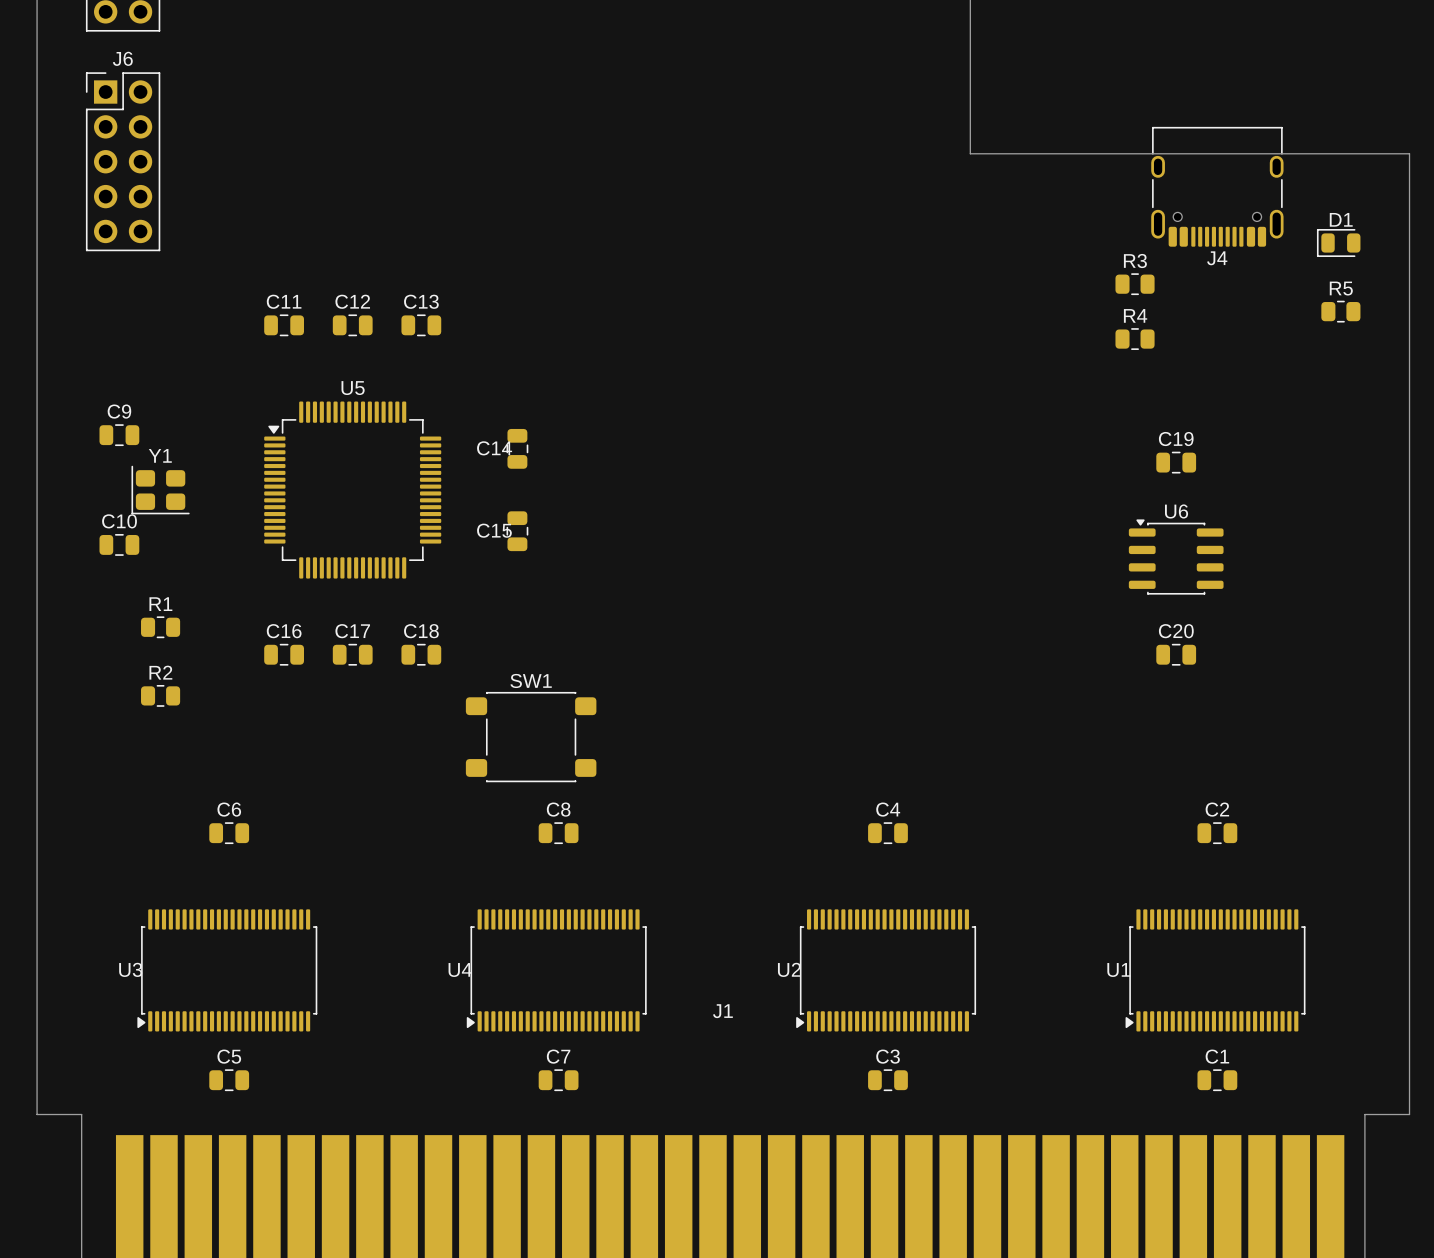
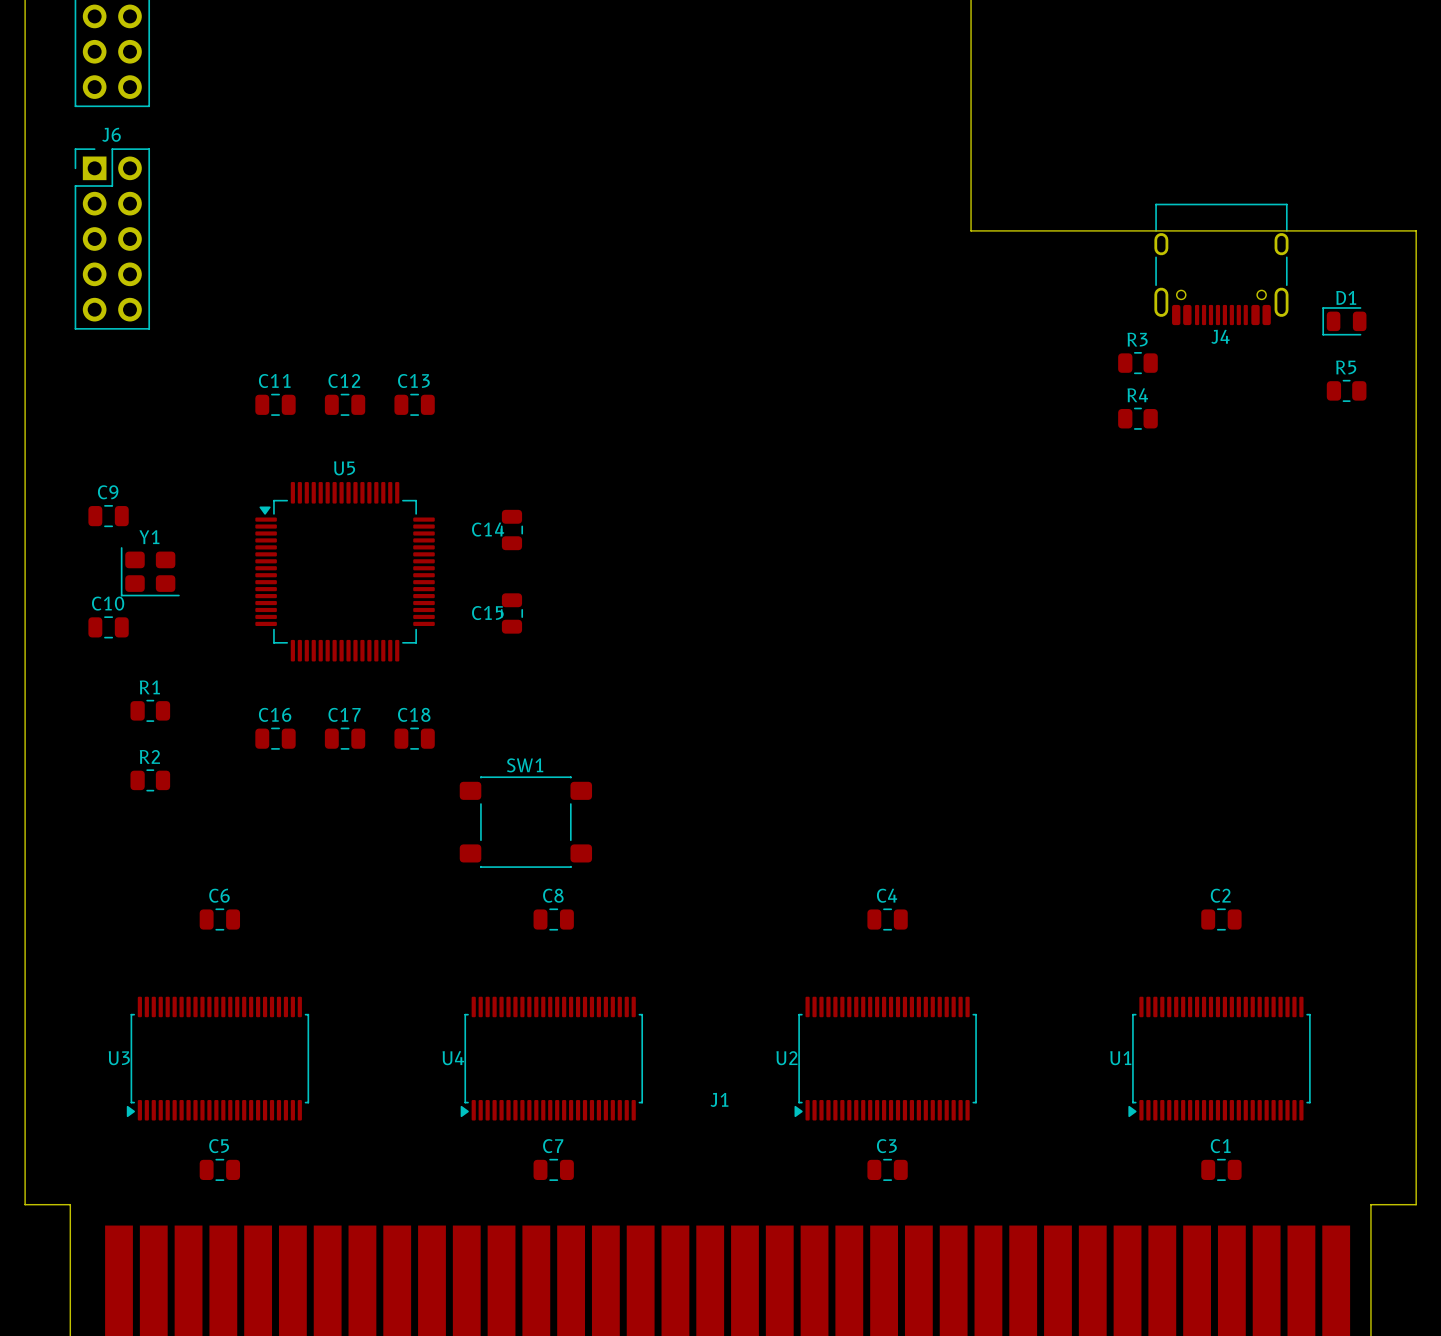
C19: (1176, 462) -> none
U6: (1176, 557) -> none
C20: (1176, 654) -> none

